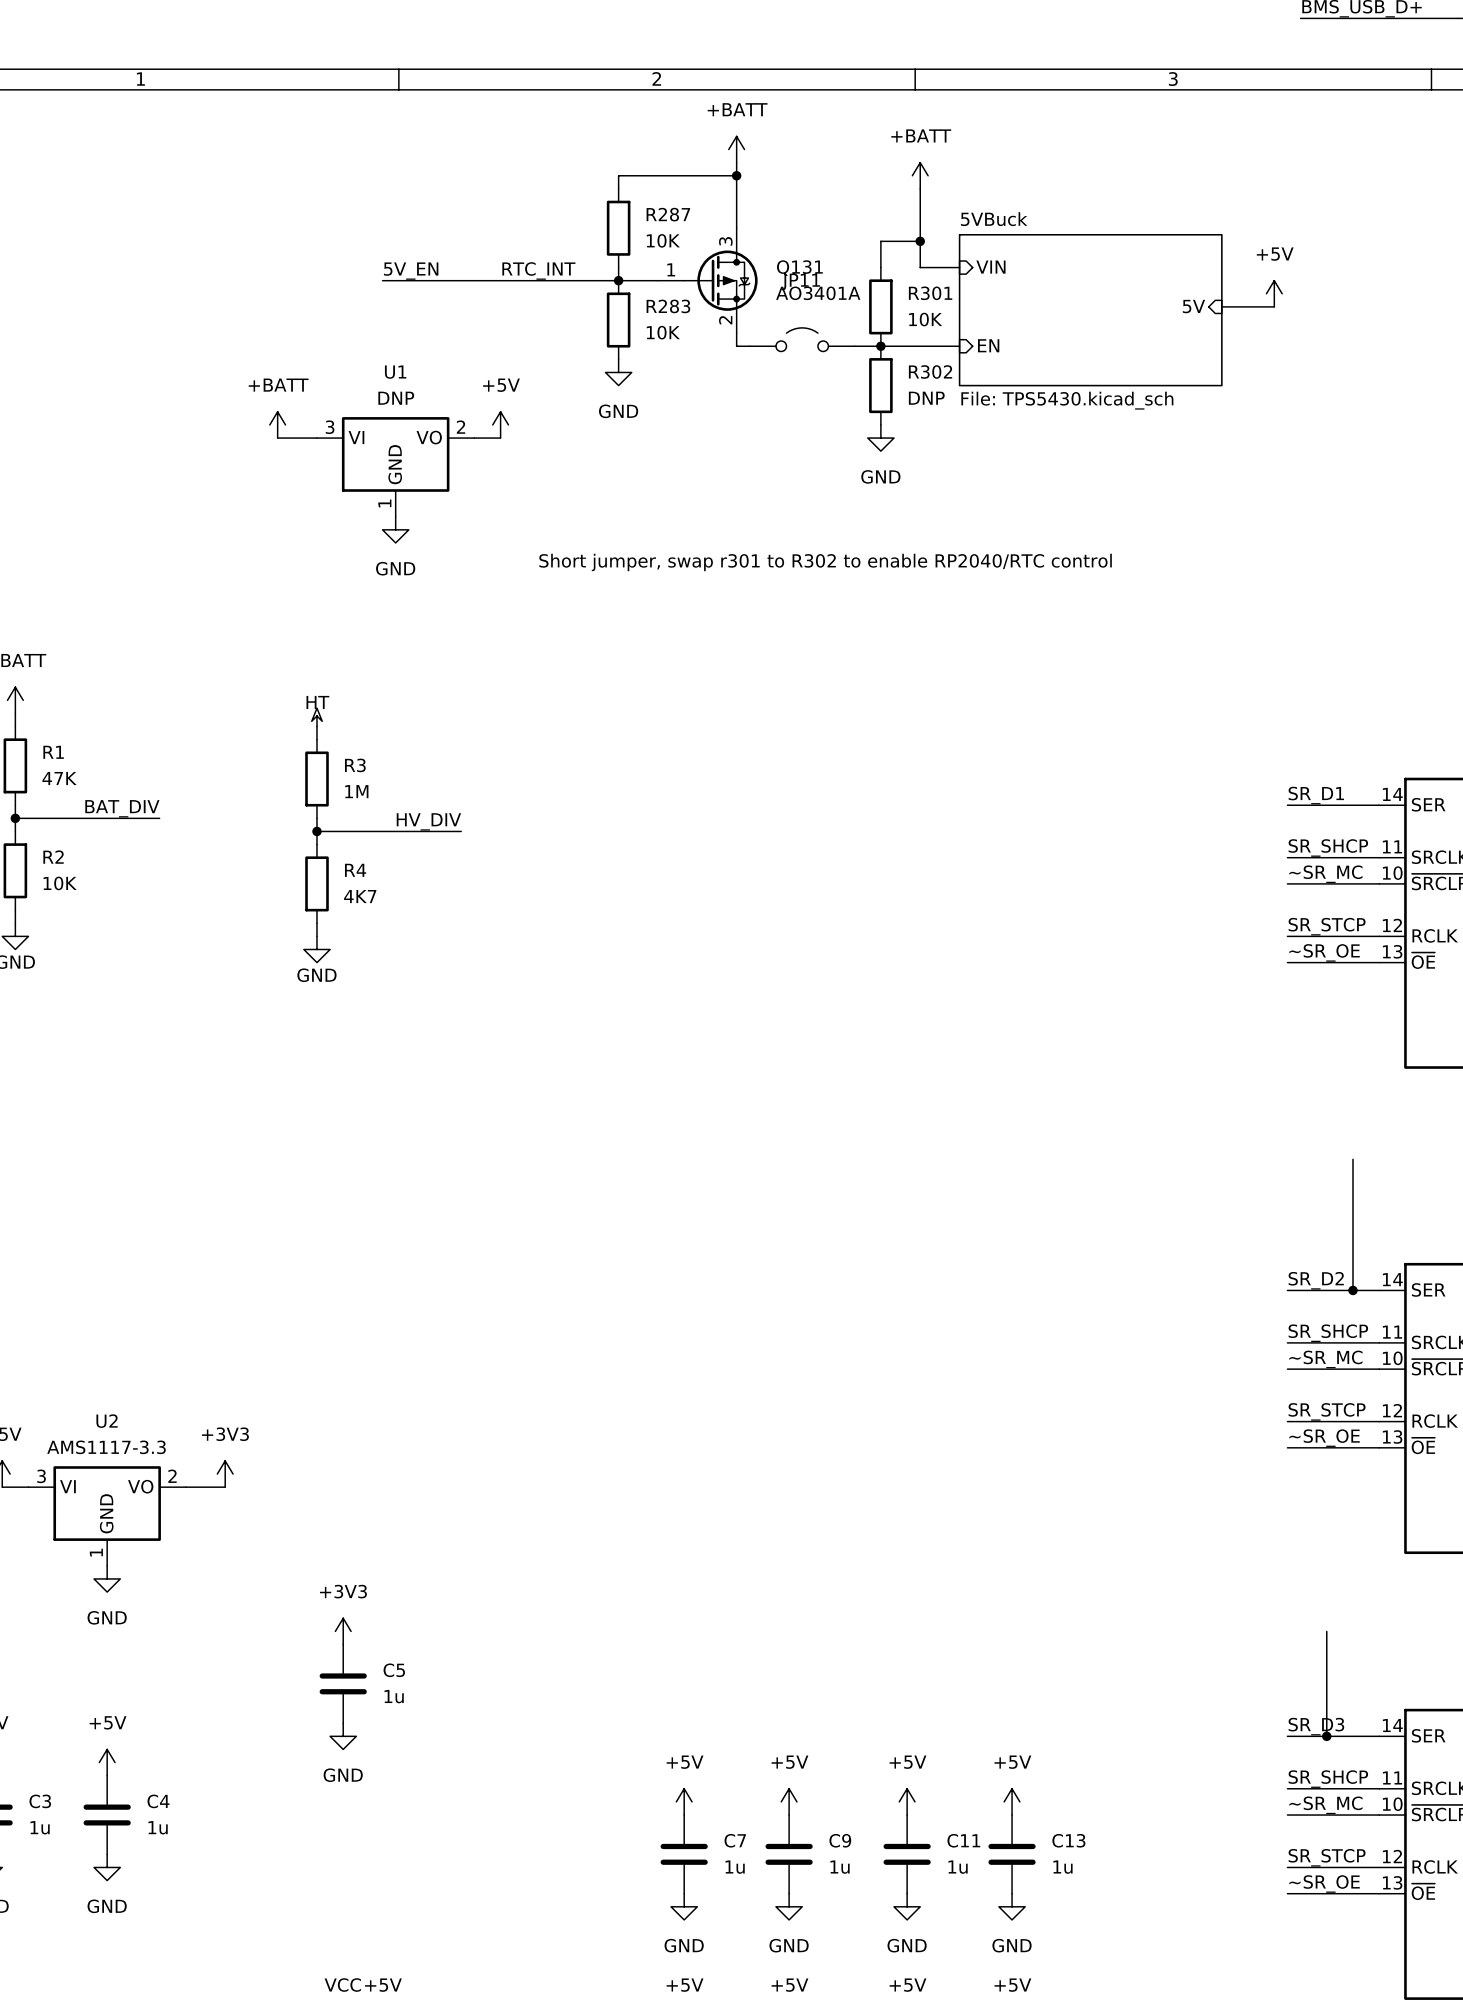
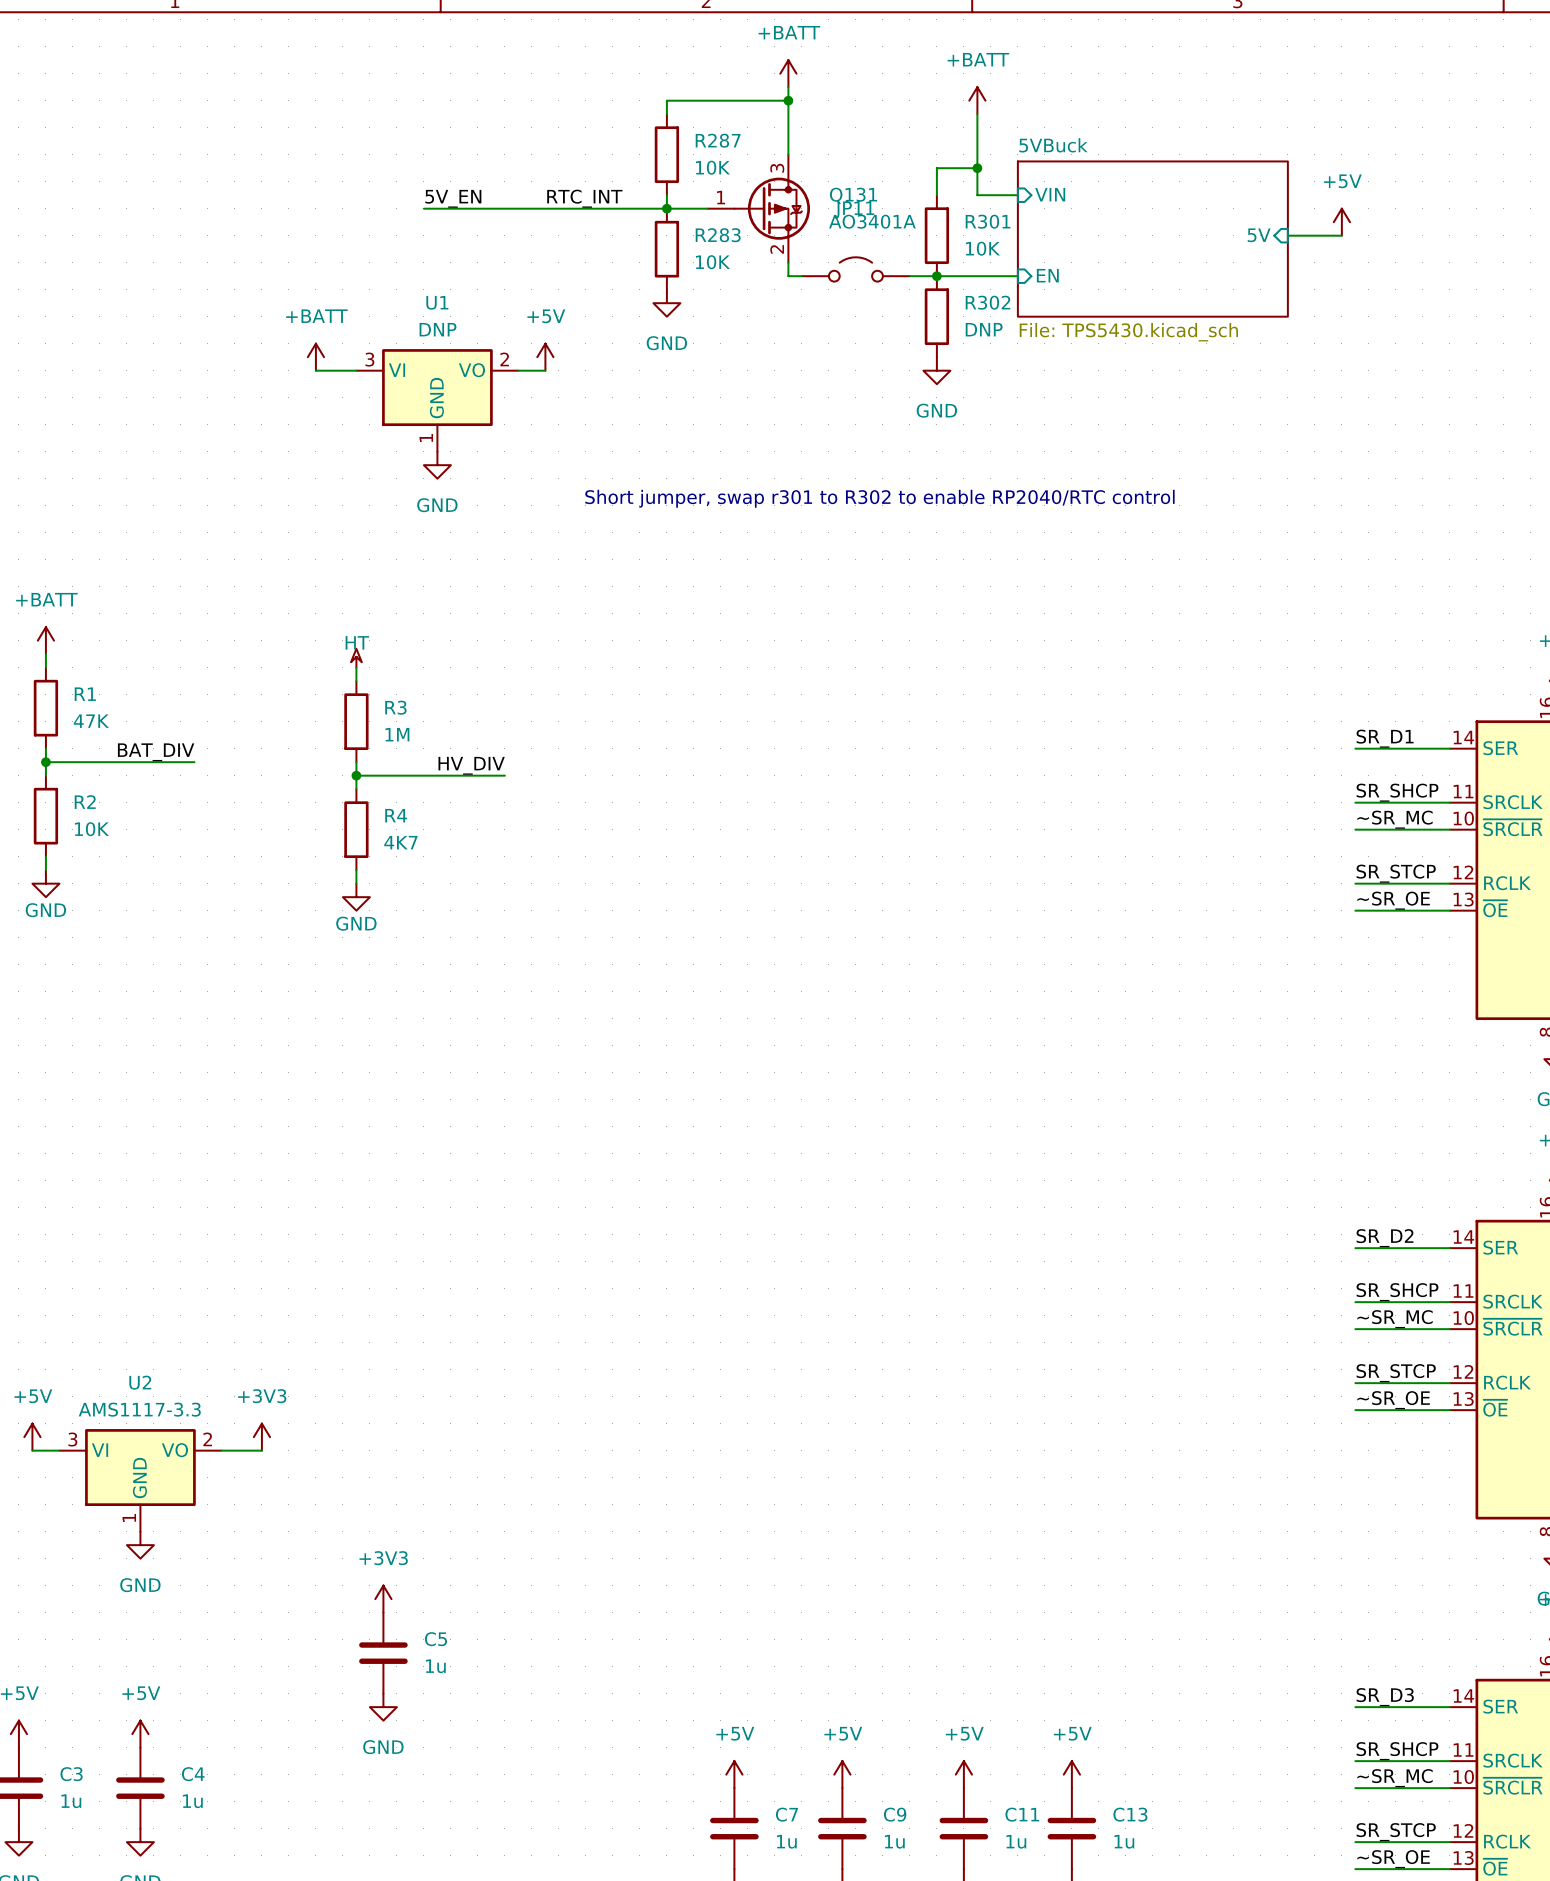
wire: (1353, 1159) (1353, 1290) -> none
junction: (1353, 1290) -> none
wire: (1326, 1631) (1326, 1736) -> none
junction: (1326, 1736) -> none

